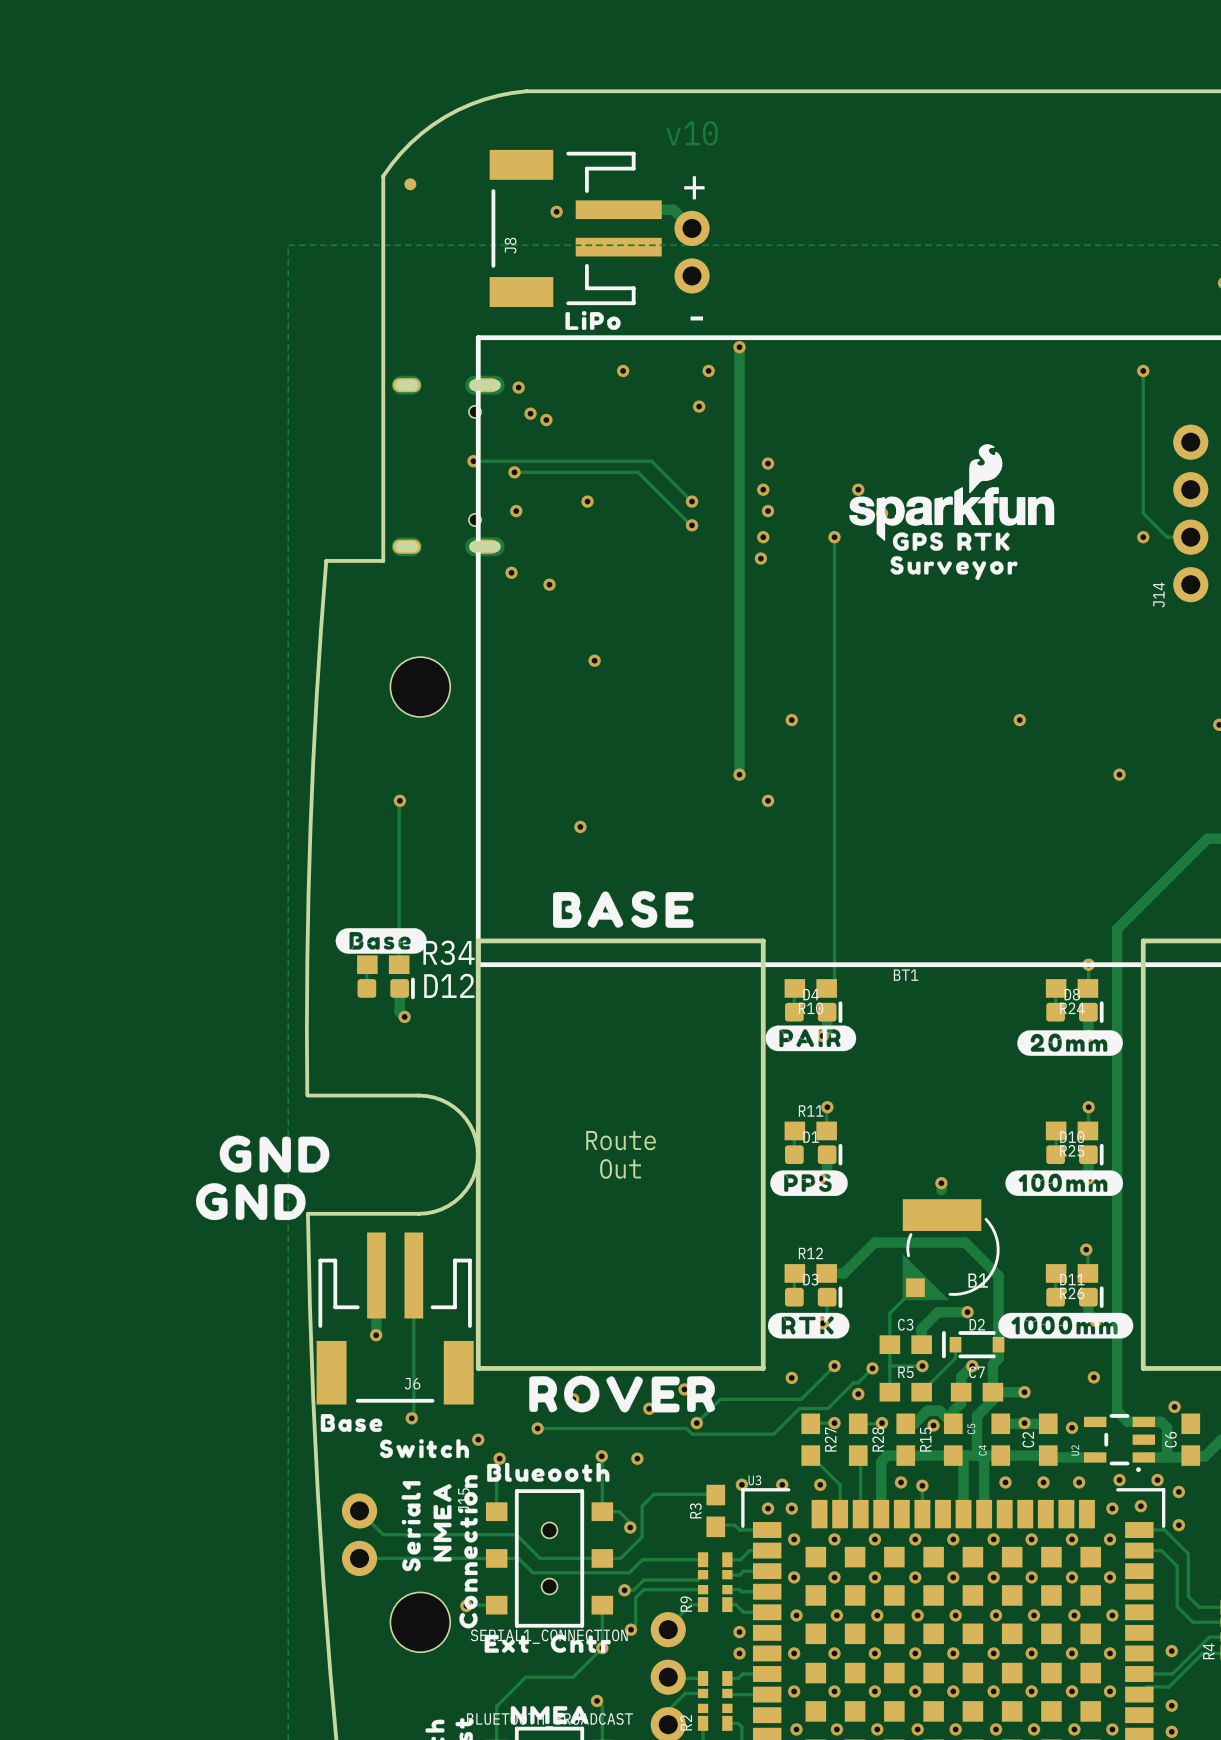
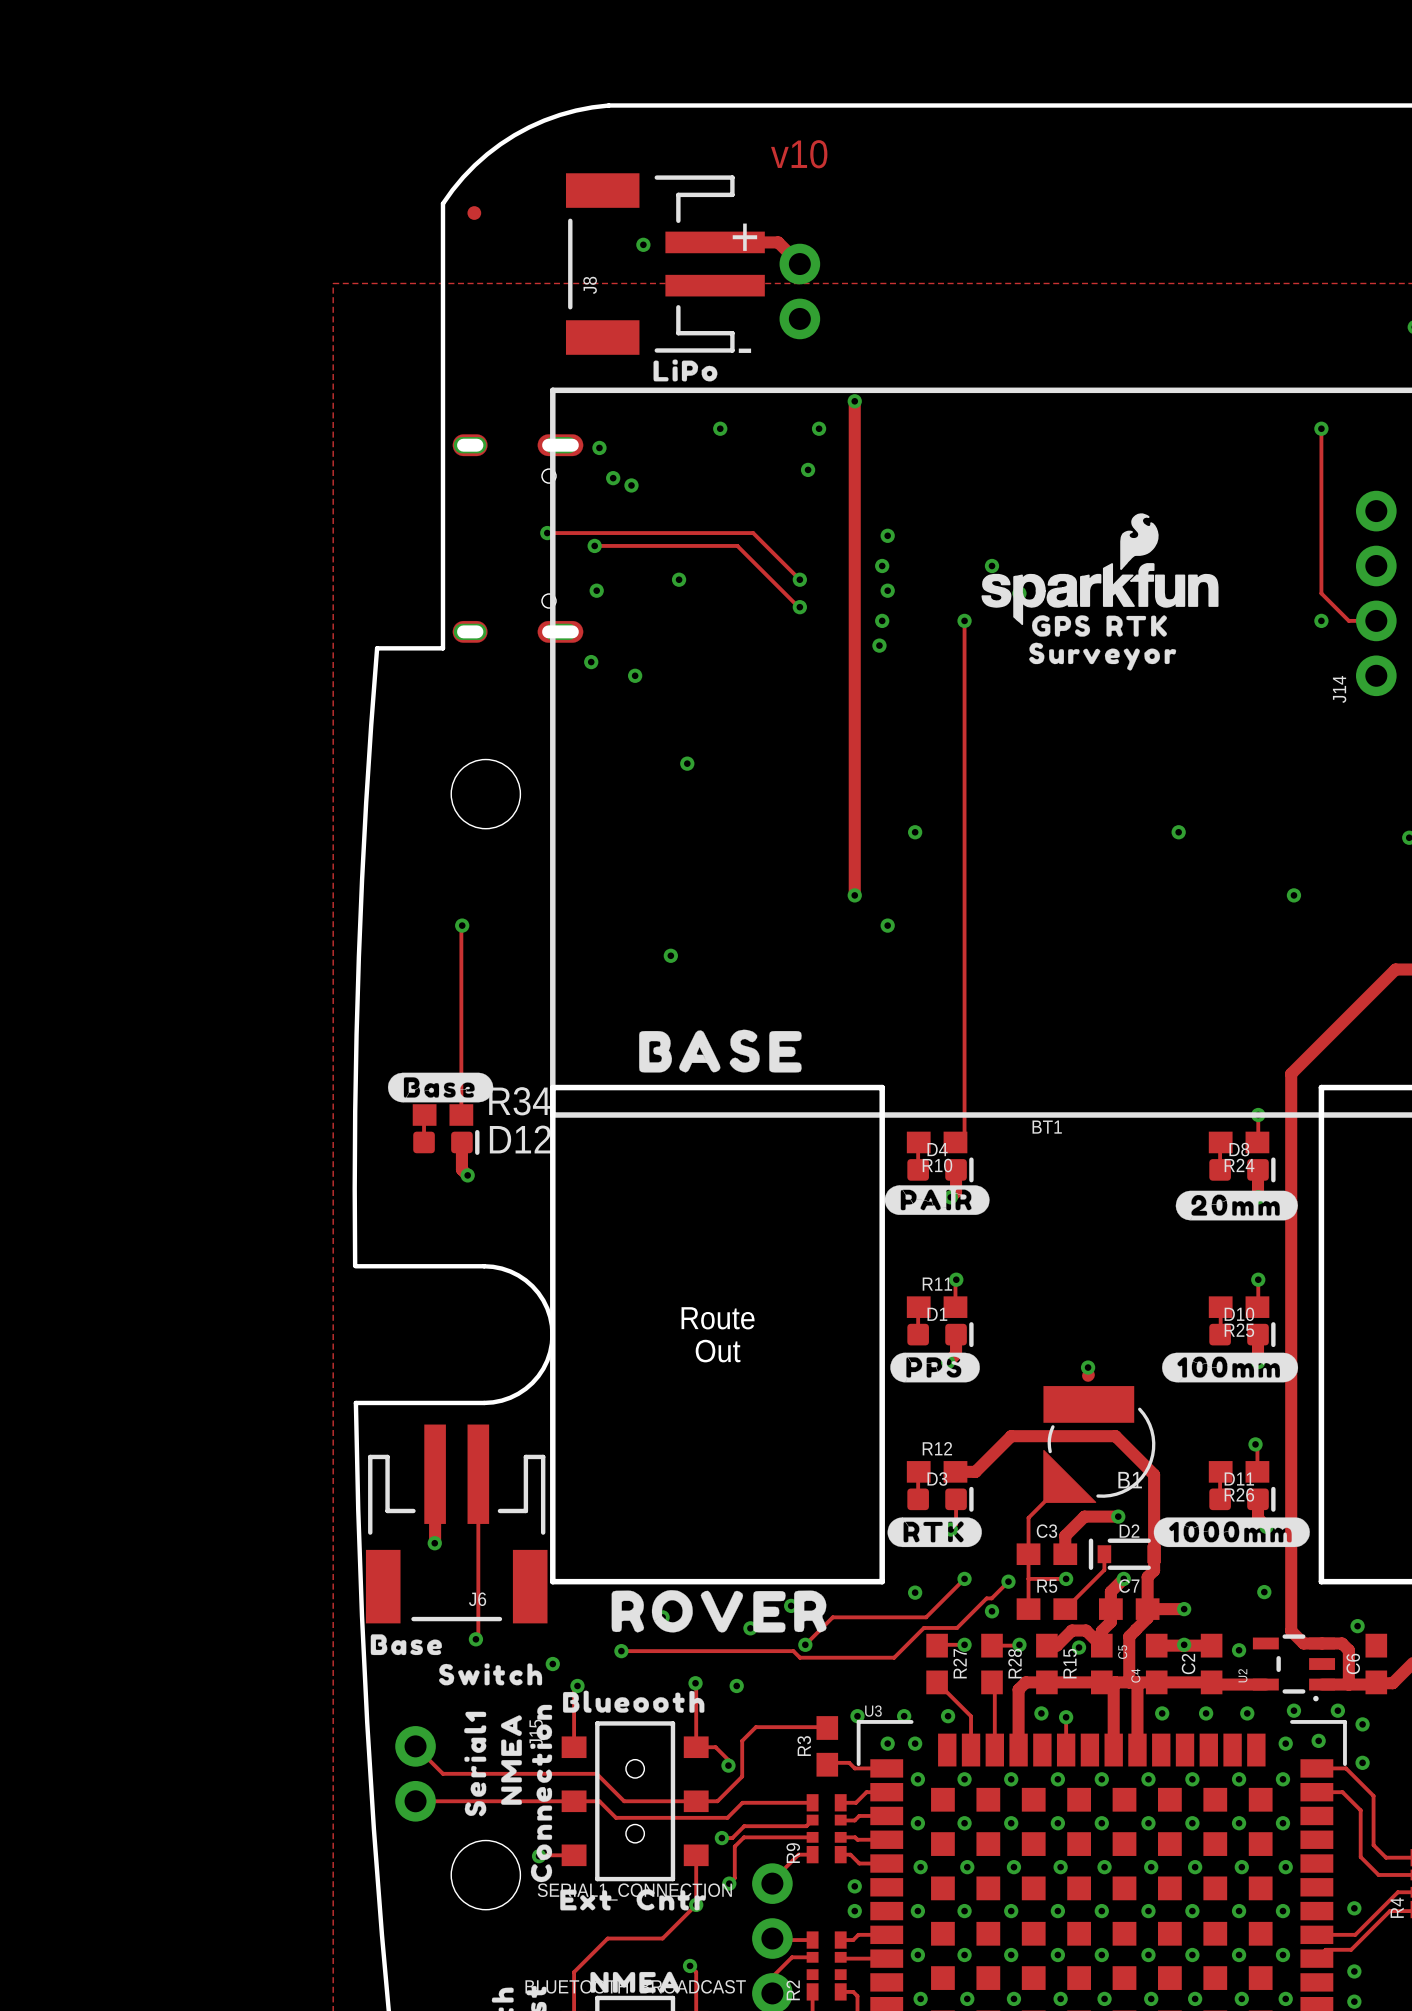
text position: + (694, 187) -> + (744, 237)
text position: - (696, 318) -> - (744, 350)
drawing: [195, 1135, 330, 1221] -> none

